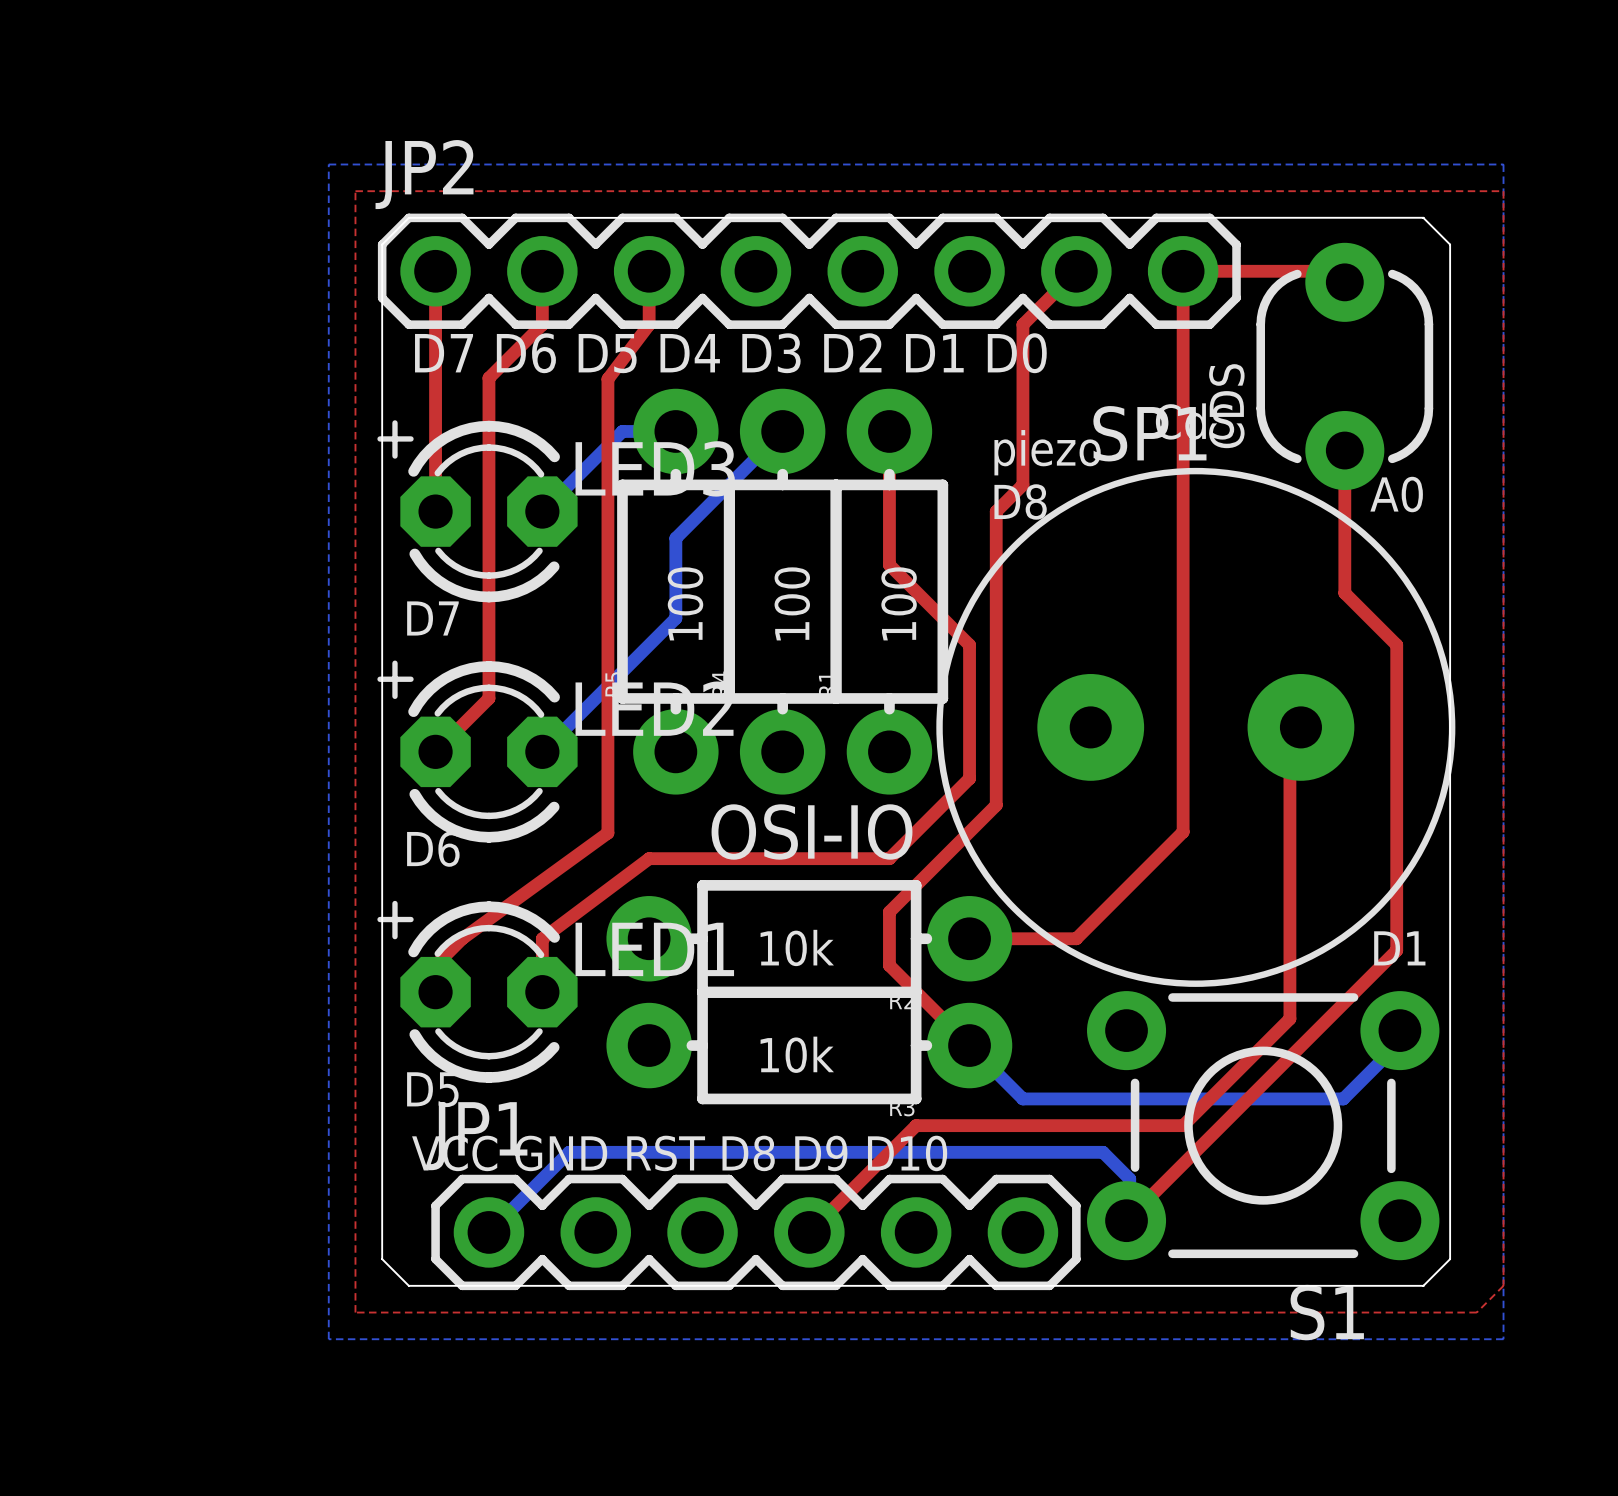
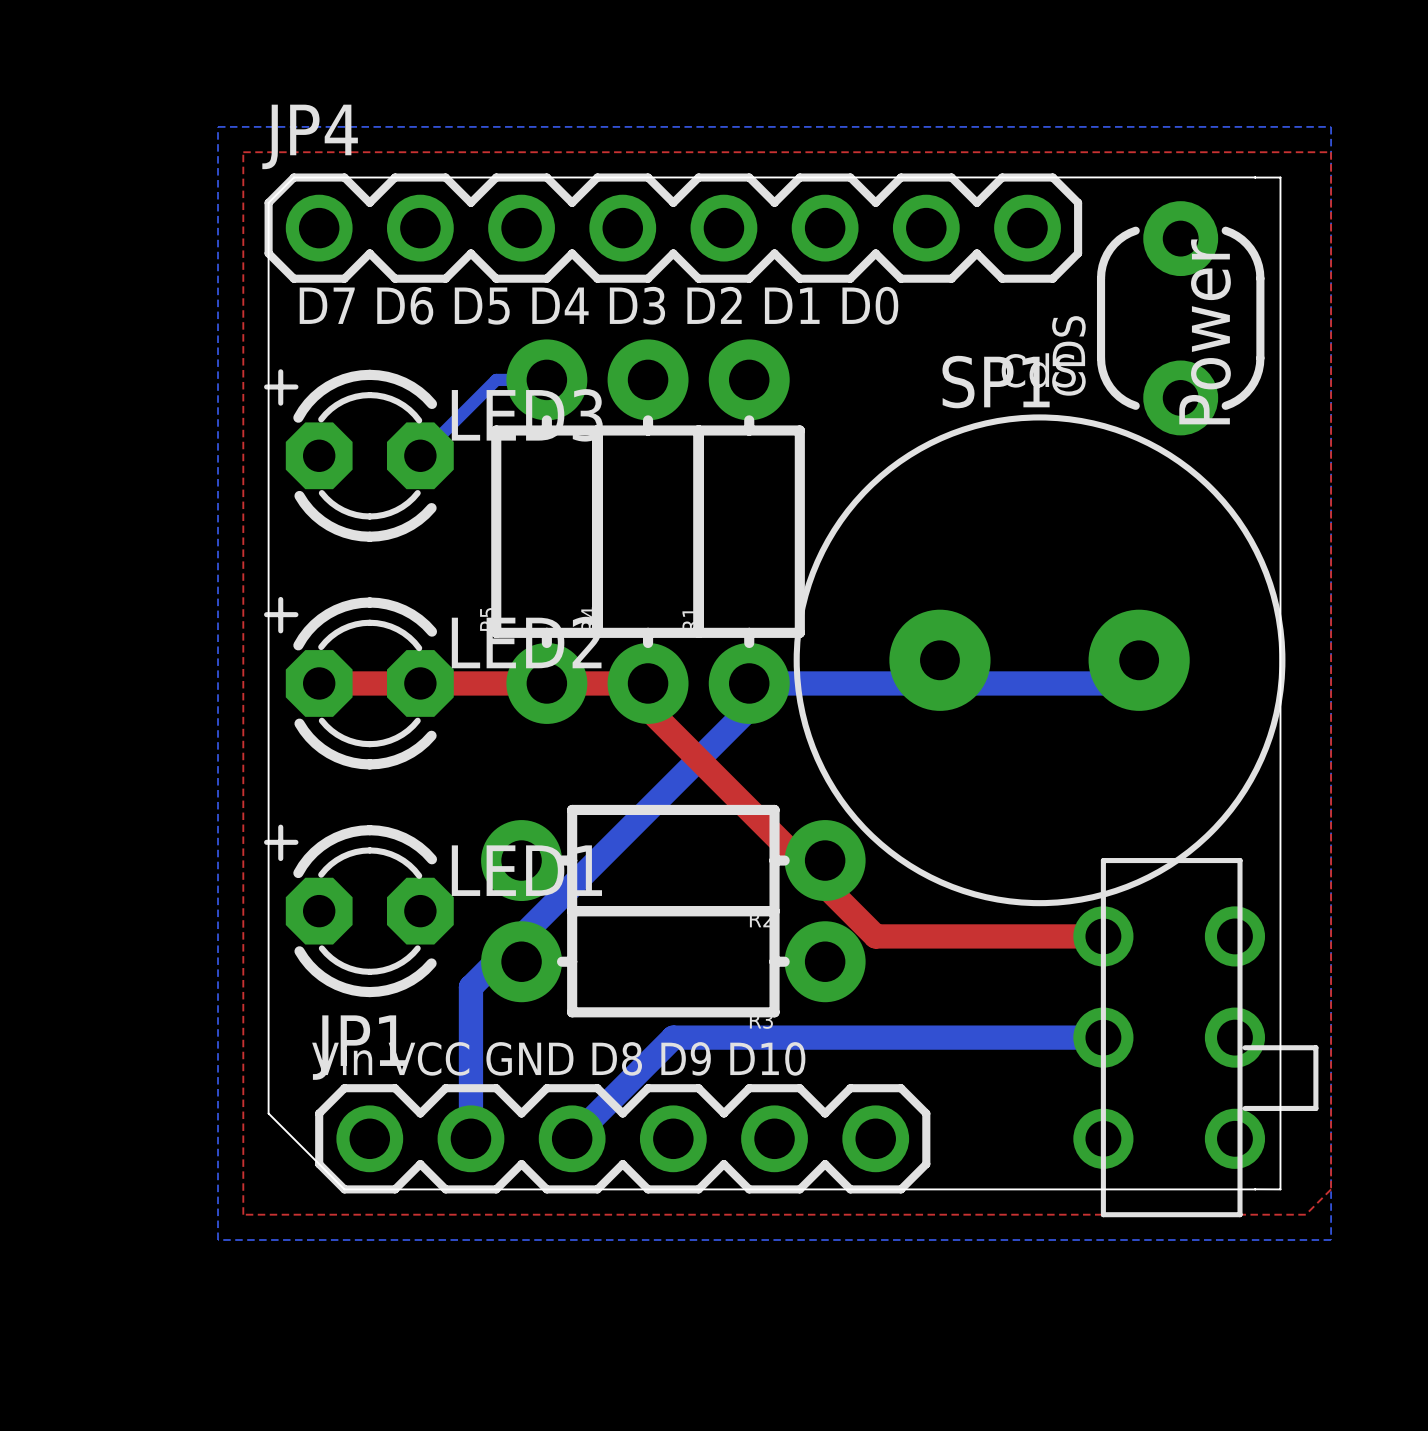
JP2 name: JP2 (424, 174) -> JP4 (310, 136)
board edge: (1423, 217) (1450, 244) -> (1255, 177) (1280, 177) (1280, 202)
top track: (435, 271) (435, 511) -> none
top track: (542, 271) (542, 324) (488, 378) (488, 698) (435, 751) -> none
top track: (649, 271) (649, 324) (607, 379) (607, 833) (462, 938) (435, 965) (435, 992) -> none
top track: (1076, 271) (1022, 324) (1022, 484) (996, 511) (996, 805) (889, 912) (889, 965) (969, 1045) -> none
top track: (1344, 282) (1333, 271) (1183, 271) (1183, 831) (1076, 938) (969, 938) -> none
text: none -> Power (1205, 331)
bottom track: (782, 431) (675, 538) (675, 618) (542, 751) -> none
top track: (889, 431) (889, 564) (969, 645) (969, 778) (889, 858) (649, 858) (542, 938) (542, 992) -> none
top track: (1344, 450) (1344, 593) (1396, 645) (1396, 950) (1126, 1220) -> none
text: piezo (1047, 452) -> none
text: A0 (1396, 494) -> none
text: D8 (1020, 501) -> none
text: 100 (685, 603) -> none
text: 100 (792, 603) -> none
text: 100 (899, 603) -> none
text: D7 (432, 618) -> none
top track: (1300, 727) (1289, 738) (1289, 1018) (1183, 1125) (916, 1125) (809, 1232) -> none
top track: none -> (344, 683) (622, 683) (875, 936) (1103, 936)
bottom track: none -> (1141, 683) (774, 683) (470, 987) (470, 1138)
text: OSI-IO (812, 832) -> none
text: D6 (433, 849) -> none
text: 10k (797, 947) -> none
text: D1 (1399, 948) -> none
bottom track: (1399, 1030) (1399, 1042) (1343, 1098) (1022, 1098) (969, 1045) -> none
text: 10k (797, 1054) -> none
text: D5 (432, 1089) -> none
bottom track: none -> (1103, 1037) (673, 1037) (572, 1138)
S1: (1263, 1125) -> none
part: none -> (1195, 1037)
text: VCC GND RST D8 D9 D10 (679, 1153) -> Vin VCC GND D8 D9 D10 (558, 1058)
board edge: (382, 1205) (382, 1259) (408, 1285) (462, 1285) -> (268, 1113) (344, 1189)
bottom track: (1126, 1220) (1129, 1217) (1129, 1179) (1103, 1152) (569, 1152) (488, 1232) -> none
board edge: (1450, 1259) (1423, 1285) -> (1280, 1164) (1280, 1189) (1255, 1189)

